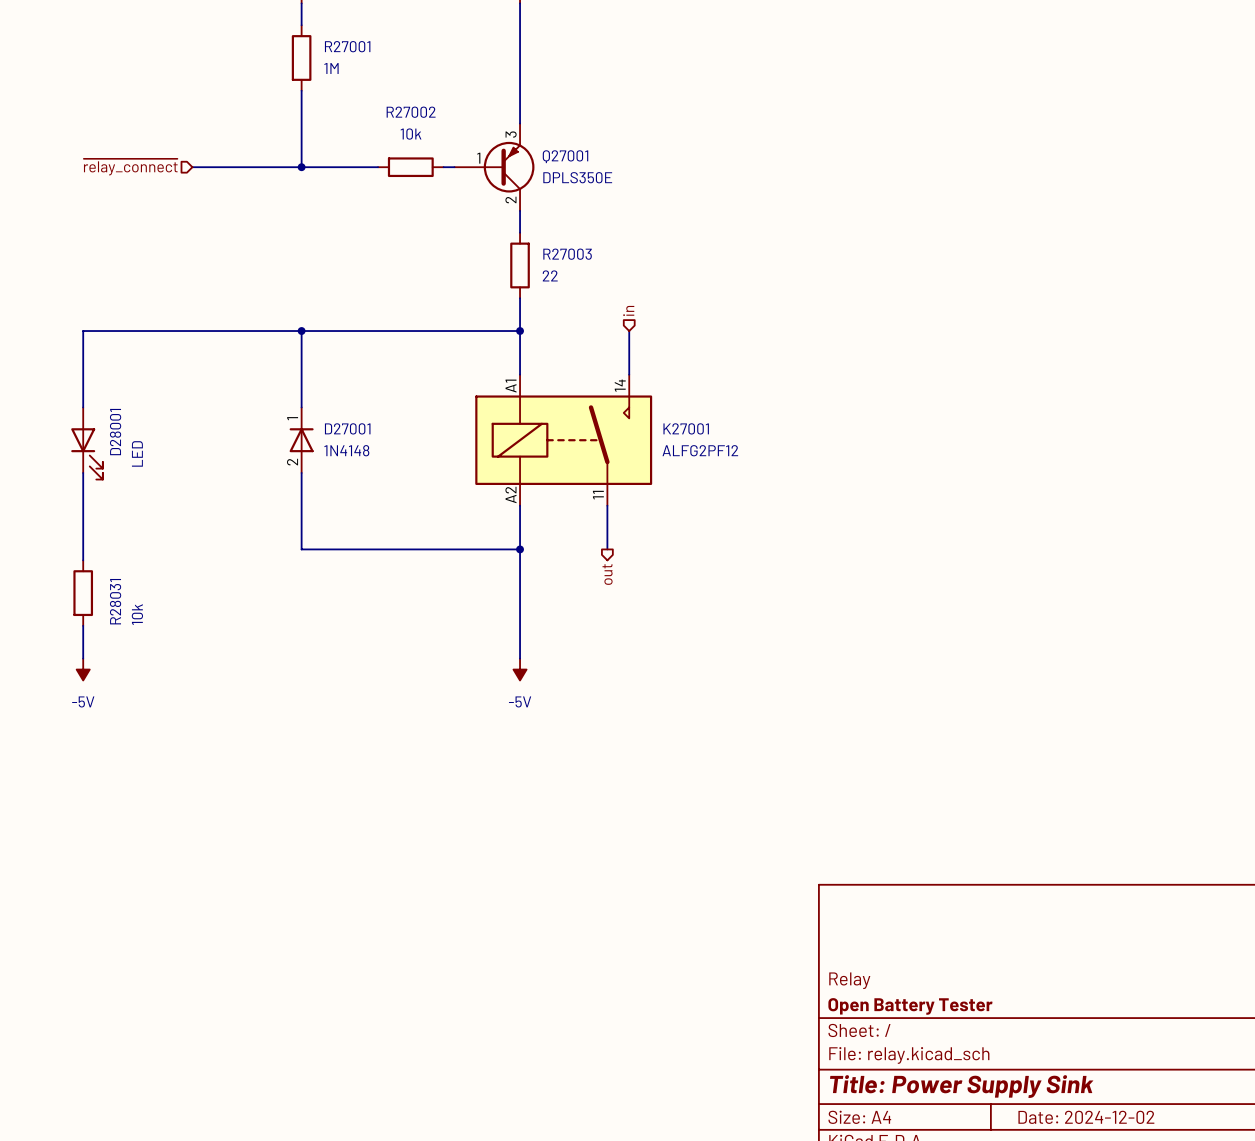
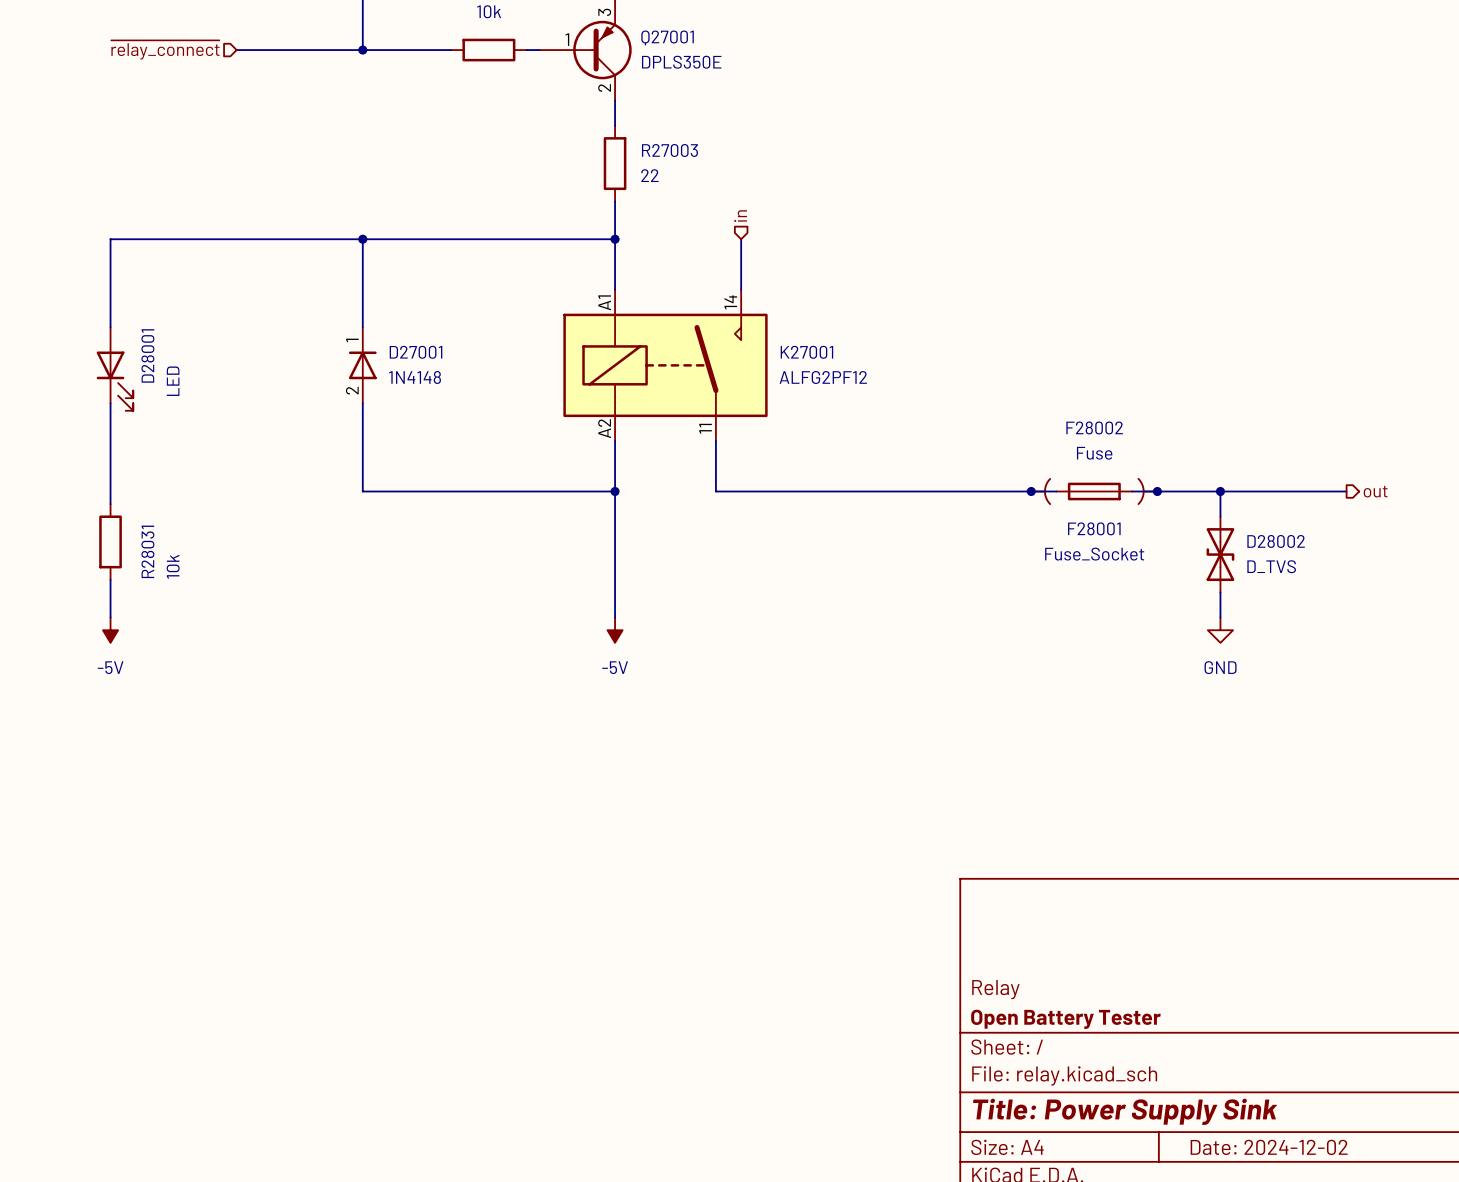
wire: none -> (715, 491) (1056, 491)
junction: none -> (1031, 491)
F28001: none -> Fuse_Socket (1094, 491)
F28002: none -> Fuse (1094, 491)
wire: none -> (1132, 491) (1346, 491)
junction: none -> (1157, 491)
wire: none -> (1220, 491) (1220, 516)
junction: none -> (1220, 491)
hierarchical label: none -> out (1375, 491)
hierarchical label: out (607, 574) -> none
D28002: none -> D_TVS (1220, 554)
wire: none -> (1220, 592) (1220, 617)
power symbol: none -> GND (1220, 630)

